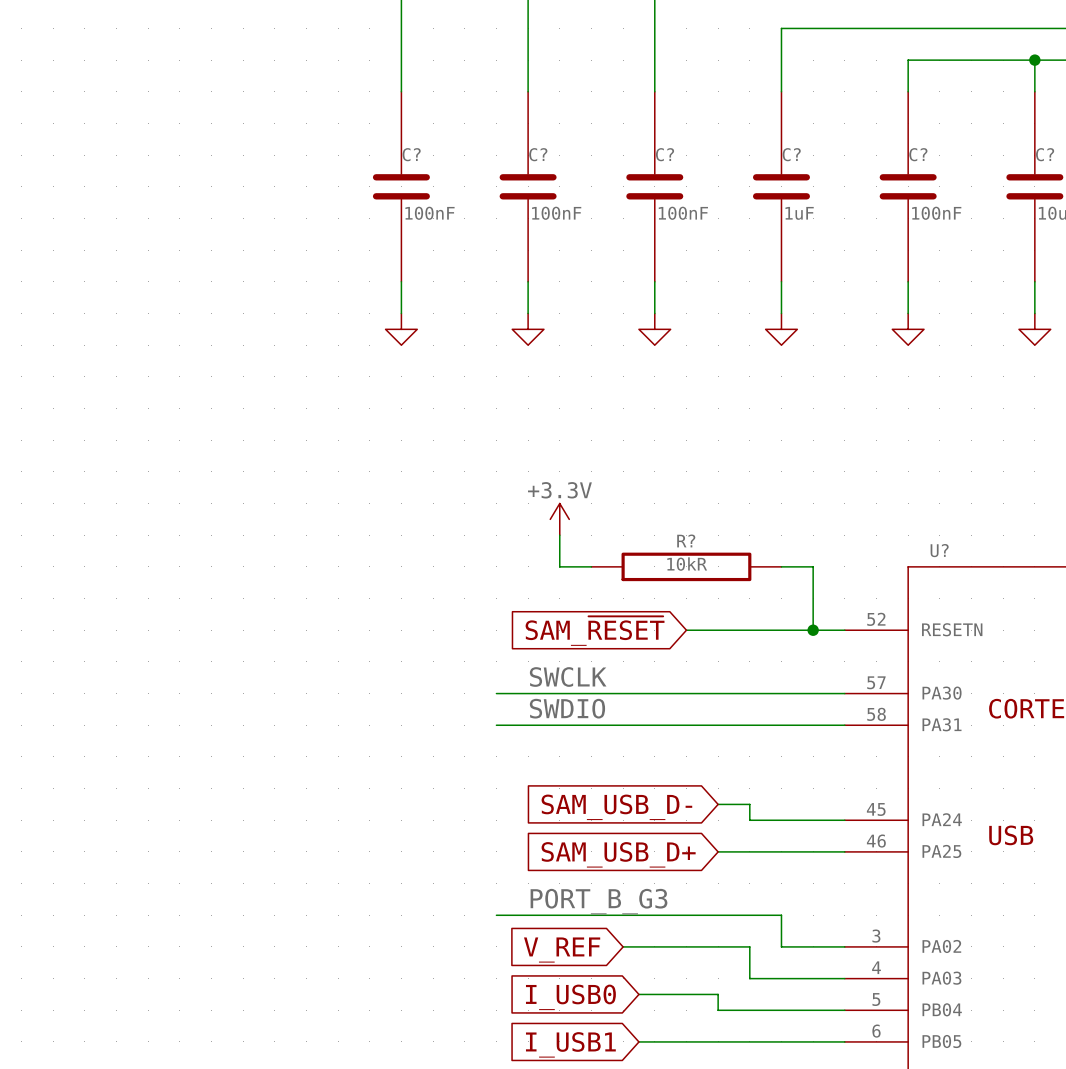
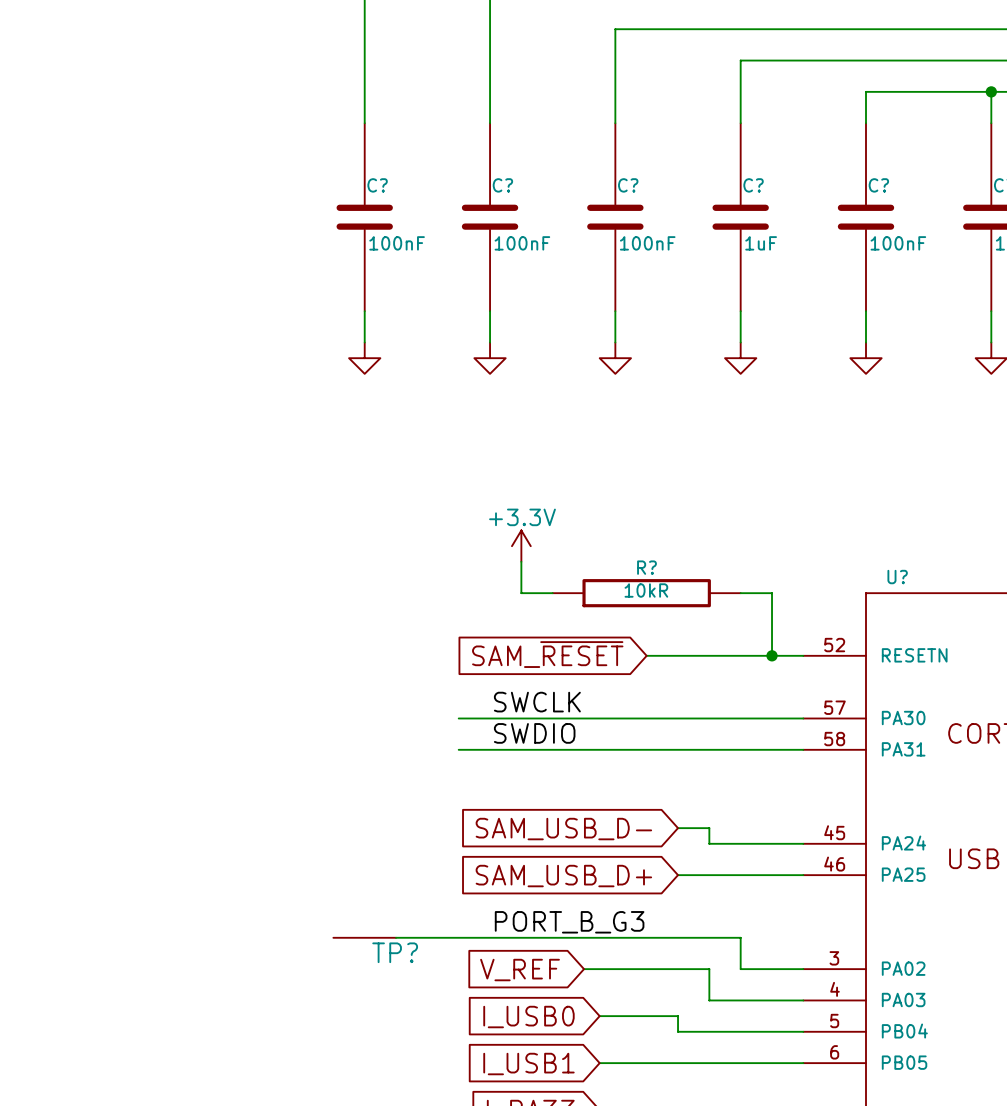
TP?: none -> (364, 937)
wire: none -> (396, 937) (458, 937)

